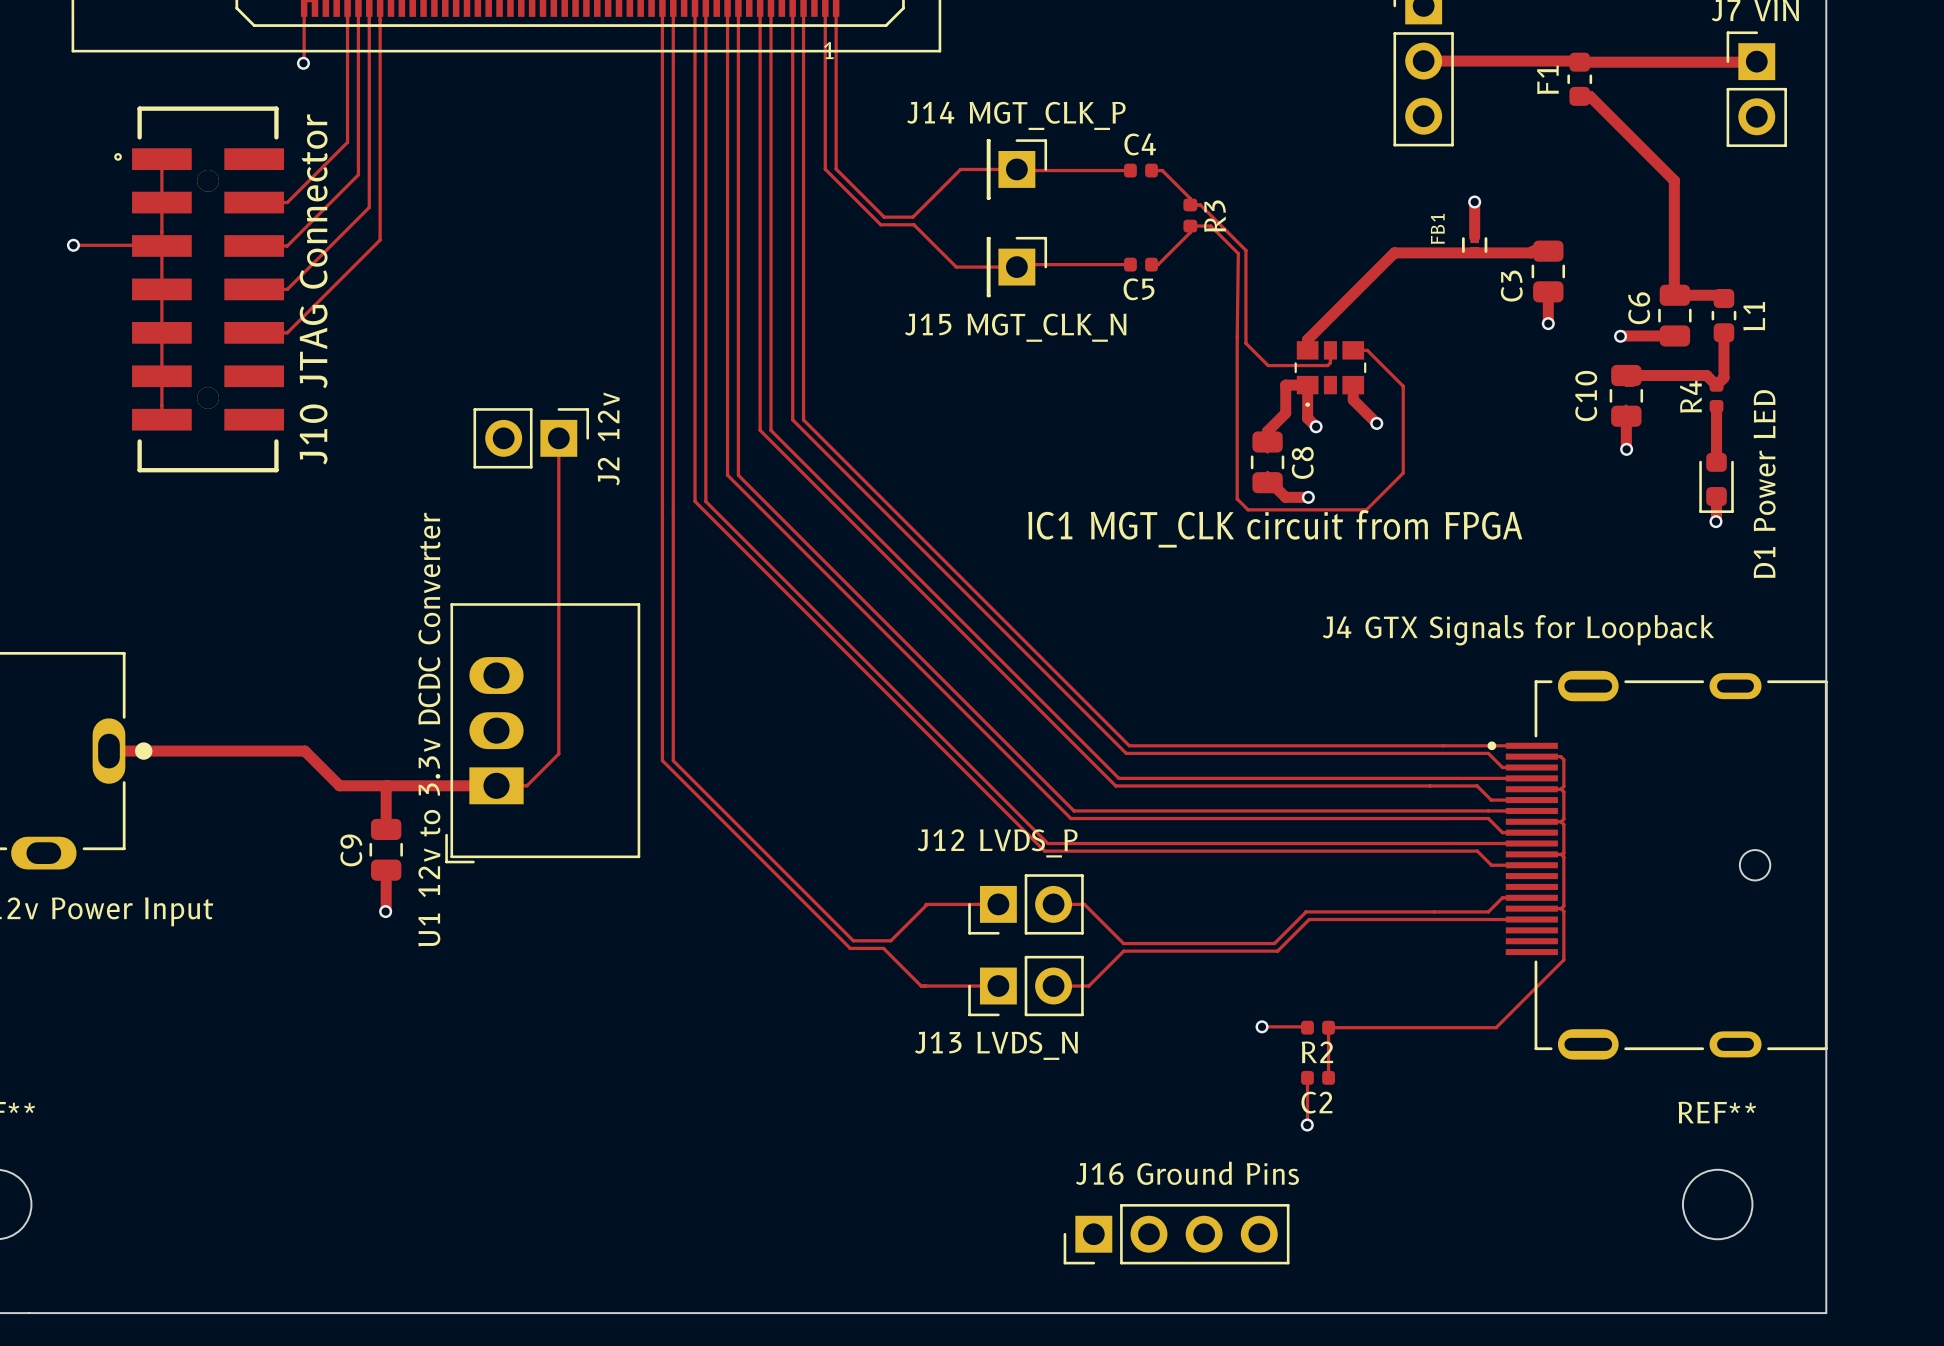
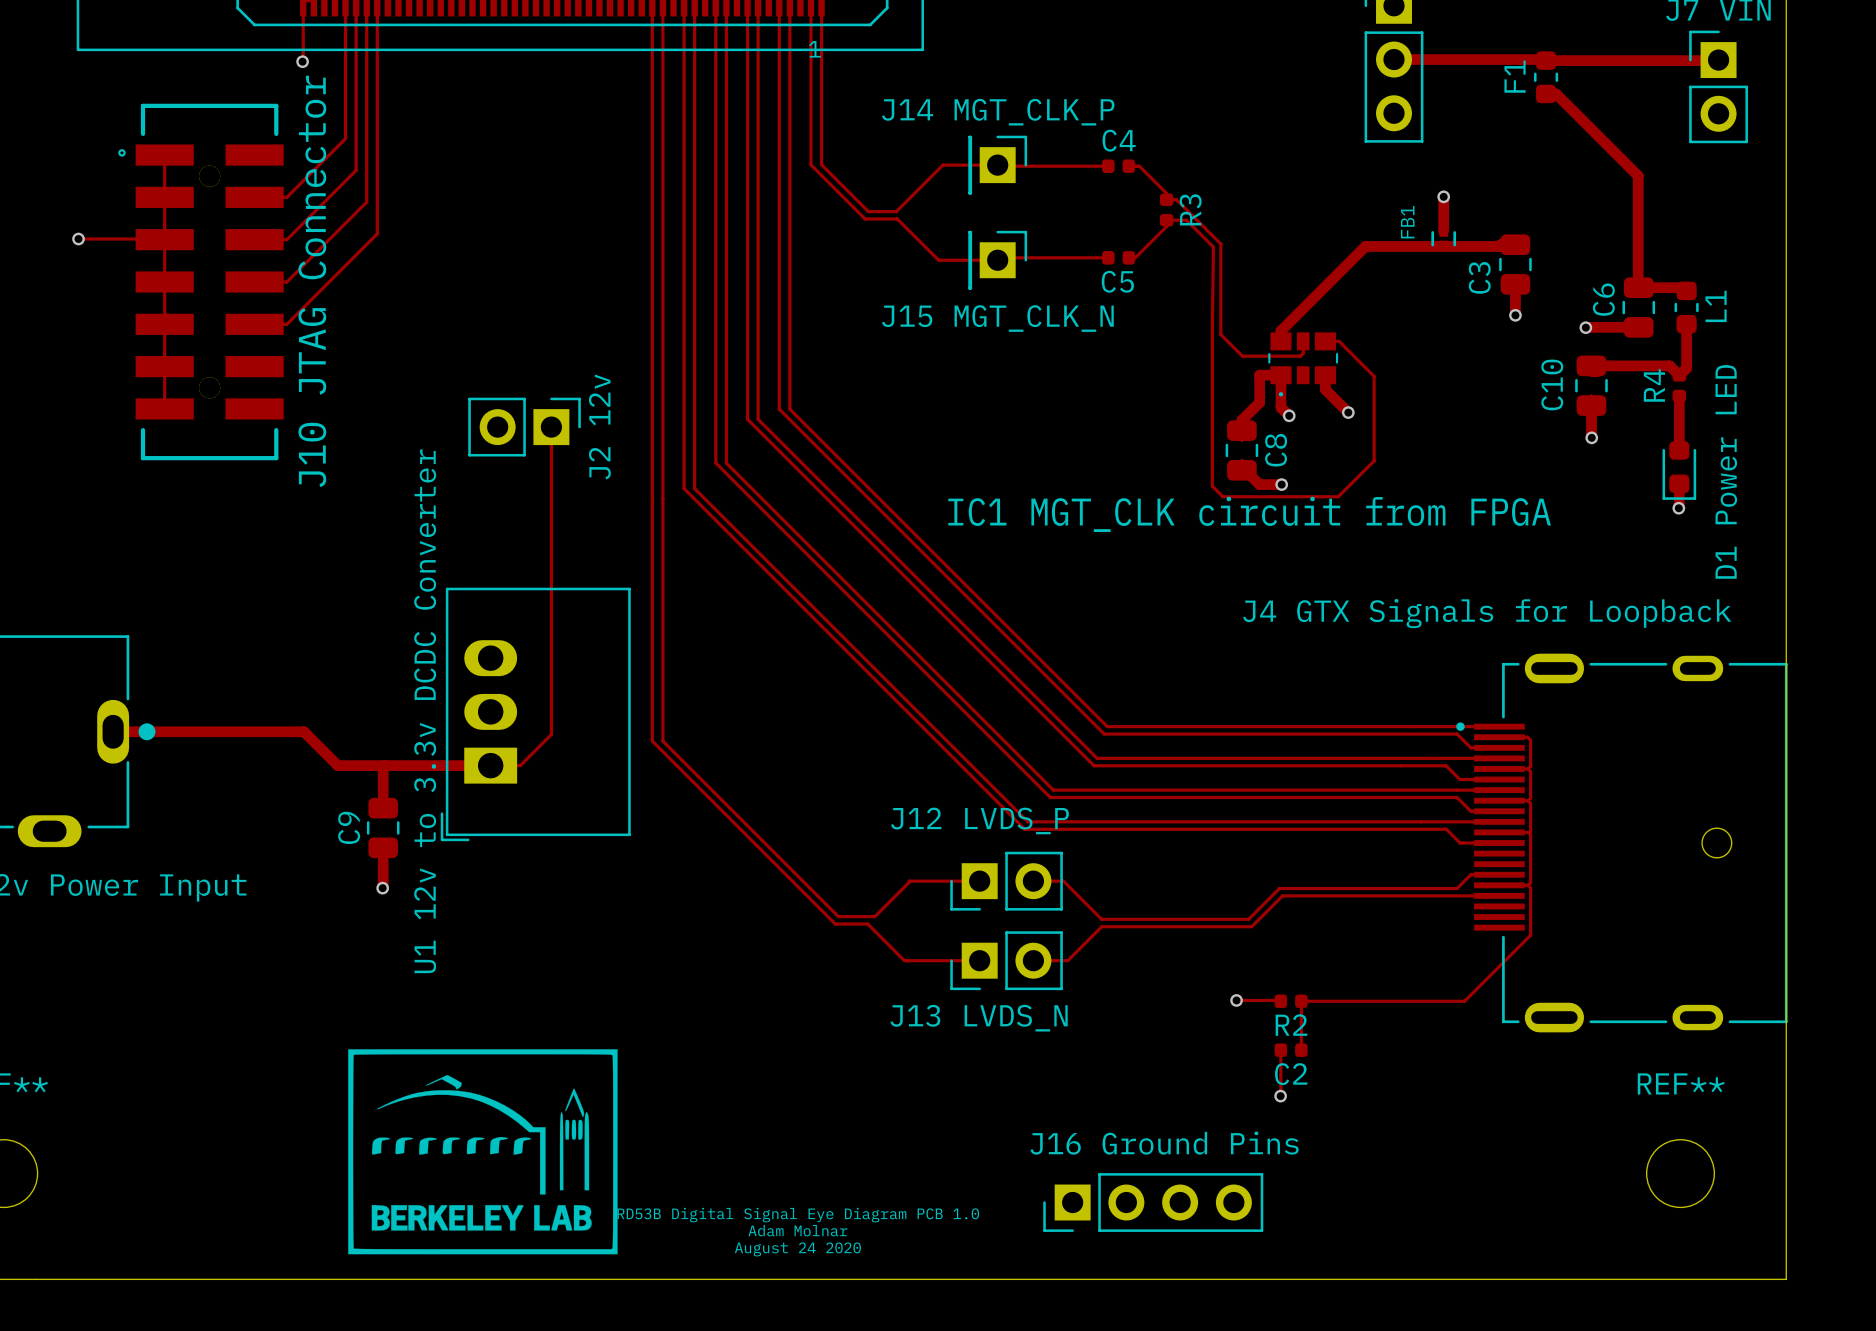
drawing: none -> [348, 1049, 618, 1255]
text: none -> RD53B Digital Signal Eye Diagram PCB 1.0 (798, 1215)
text: none -> Adam Molnar (797, 1230)
text: none -> August 24 2020 (797, 1249)

